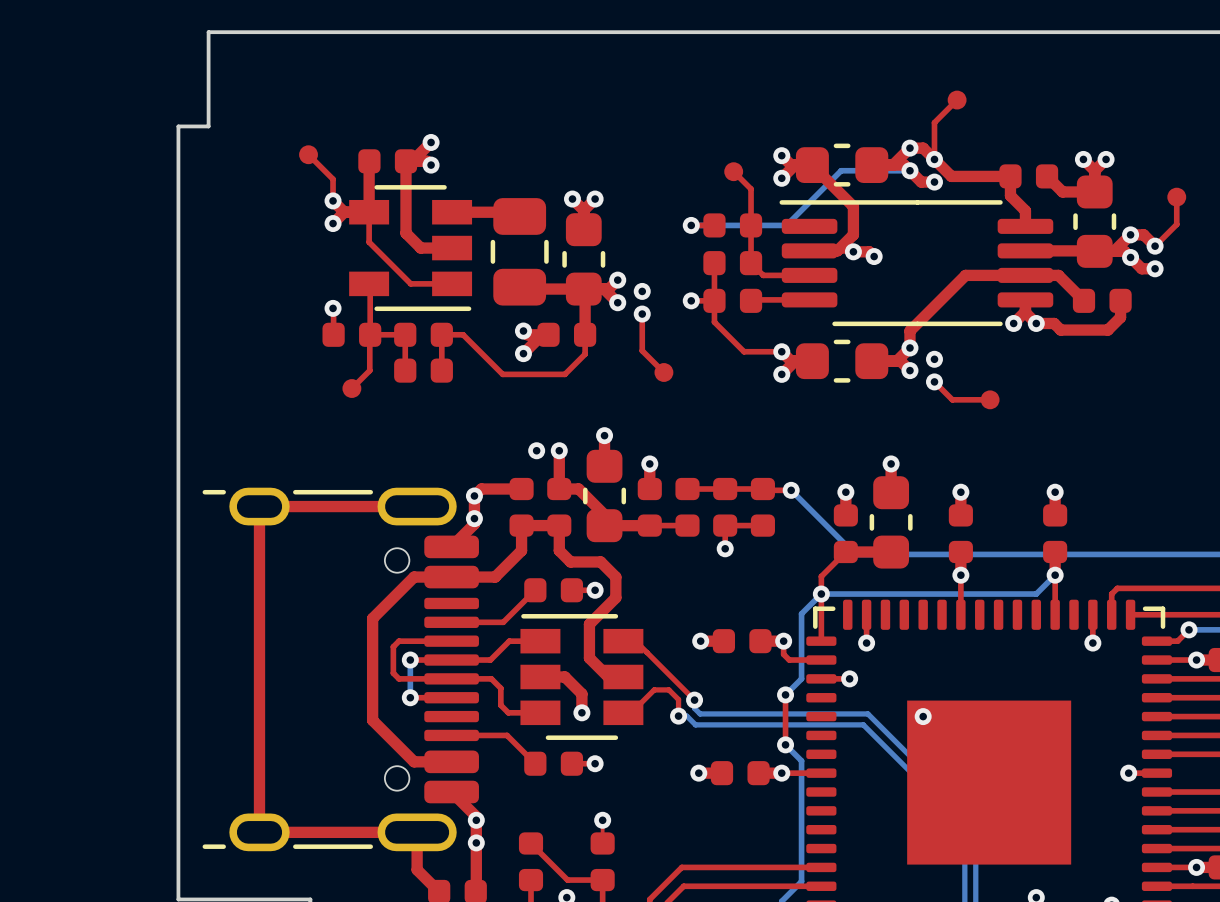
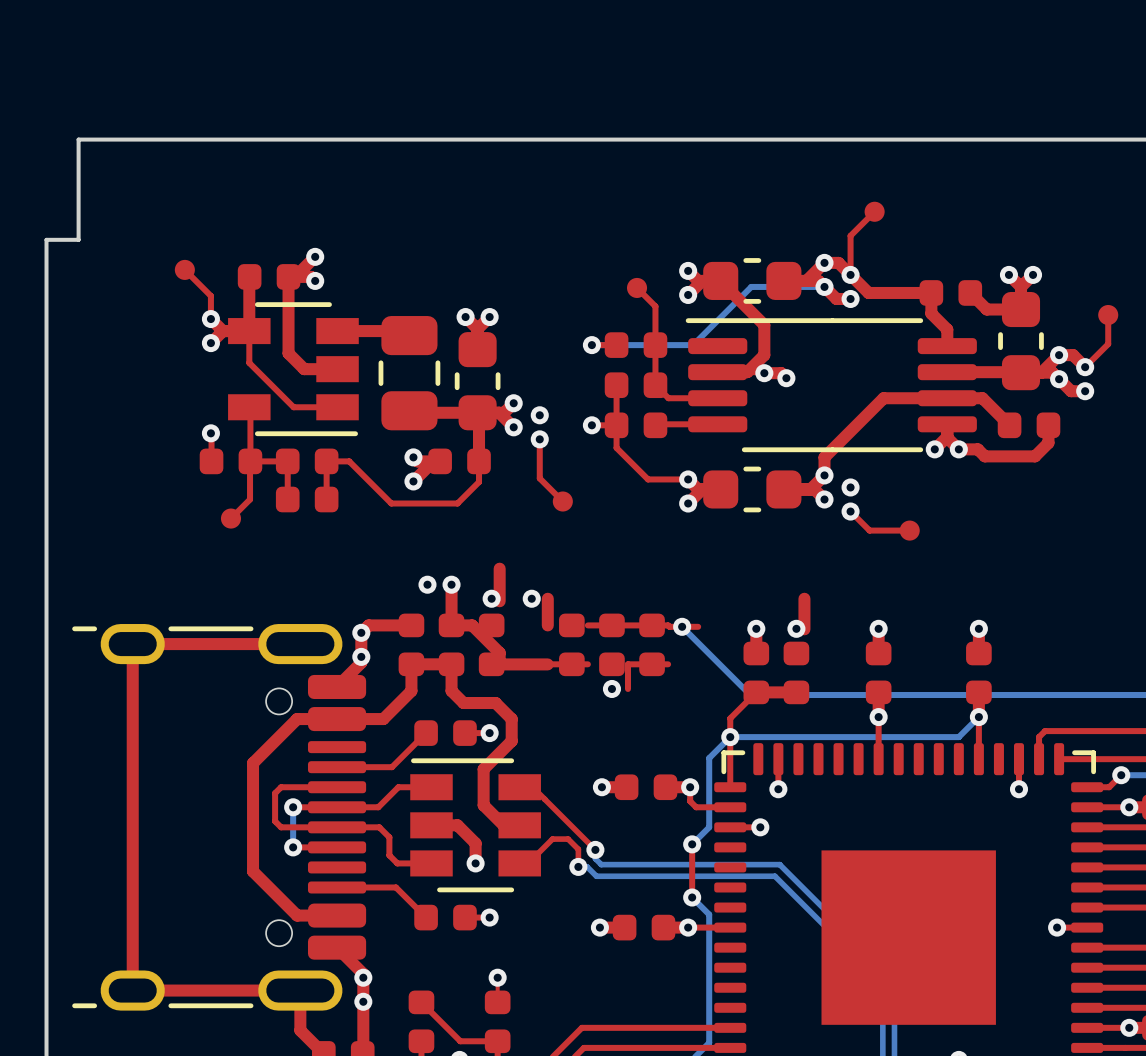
via: (604, 435) -> none
part footprint: [583, 449, 627, 543] -> [478, 613, 505, 677]
via: none -> (491, 598)
via position: (649, 463) -> (531, 598)
via position: (891, 463) -> (796, 628)
part footprint: [869, 476, 913, 569] -> [783, 641, 810, 705]
bottom track: (791, 490) (855, 554) -> (682, 626) (750, 694) (766, 694)
via position: (791, 490) -> (682, 626)
part: (649, 507) -> none
part: none -> (571, 644)
part: (687, 507) -> none
part: none -> (611, 644)
part: (725, 507) -> none
part: none -> (652, 644)
part: (762, 507) -> none
via position: (725, 548) -> (611, 688)
via: (923, 716) -> none

